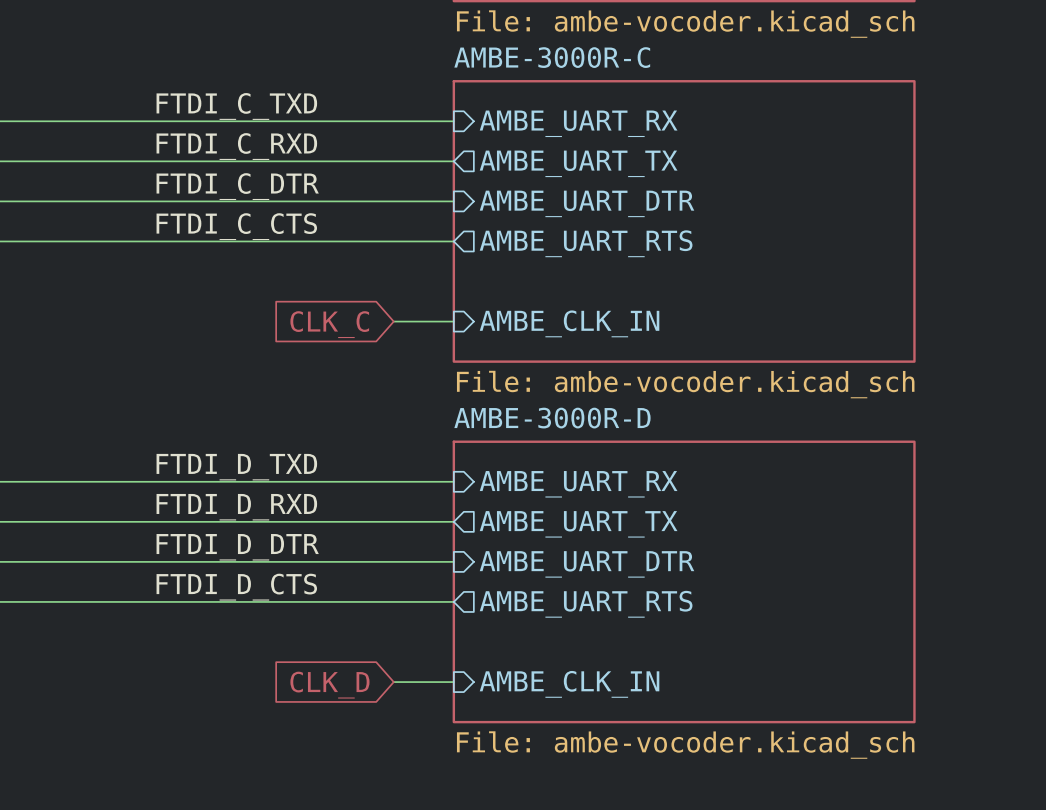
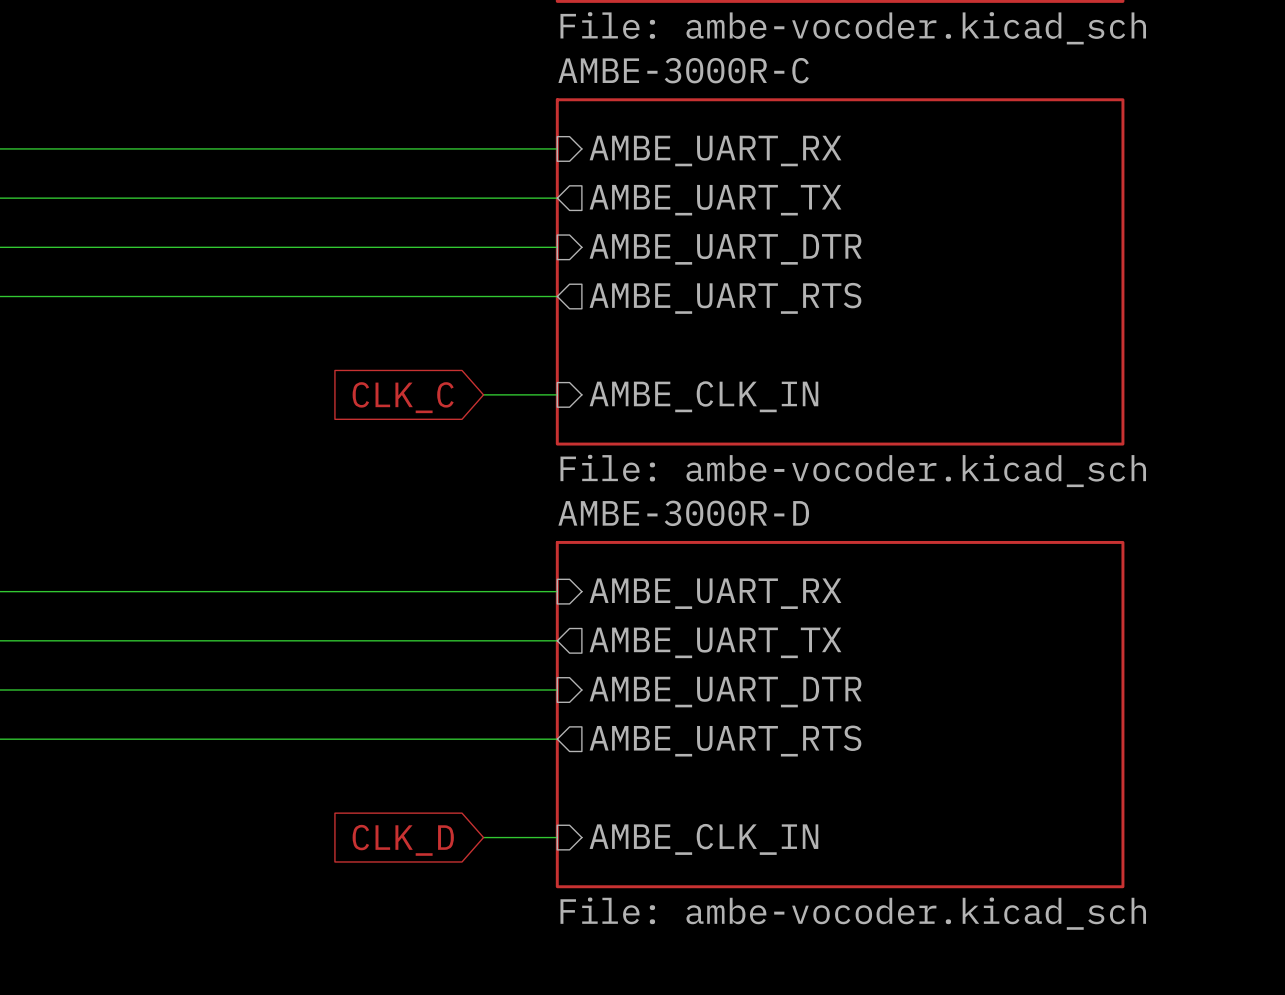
label: FTDI_C_TXD (236, 106) -> none
label: FTDI_C_RXD (236, 146) -> none
label: FTDI_C_DTR (237, 186) -> none
label: FTDI_C_CTS (236, 226) -> none
label: FTDI_D_TXD (236, 467) -> none
label: FTDI_D_RXD (236, 507) -> none
label: FTDI_D_DTR (237, 547) -> none
label: FTDI_D_CTS (236, 587) -> none

